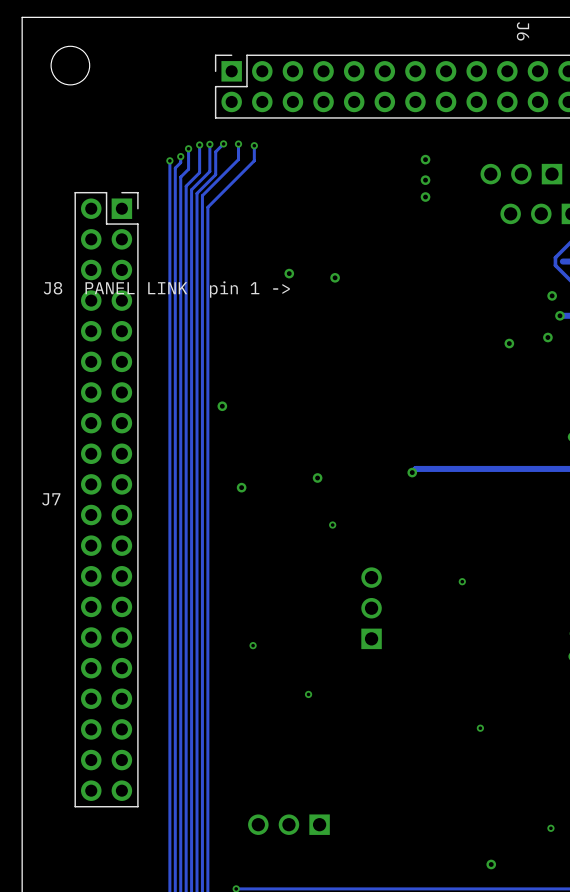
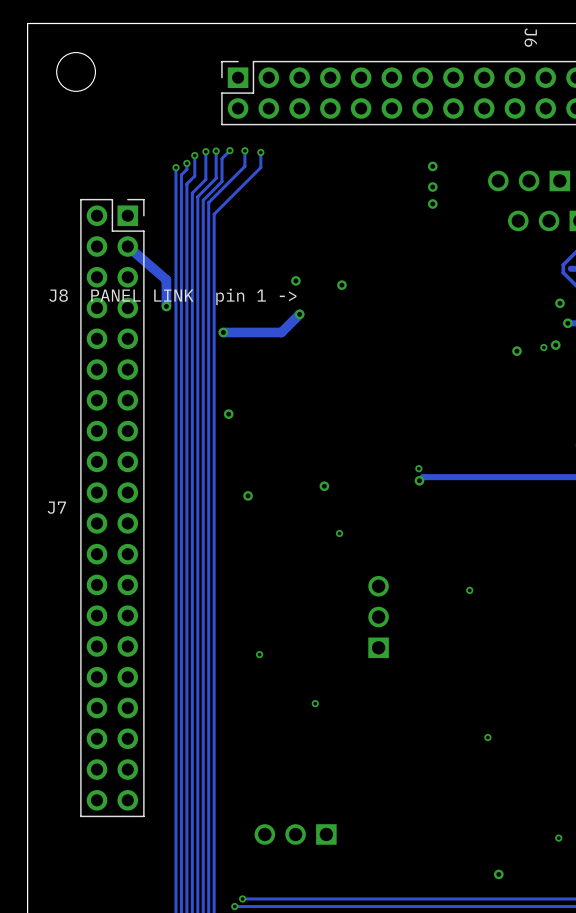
track: none -> (127, 246) (166, 279) (166, 306)
via: none -> (166, 306)
track: none -> (299, 314) (281, 332) (223, 332)
via: none -> (299, 314)
via: none -> (223, 332)
via: none -> (543, 347)
via: none -> (418, 468)

